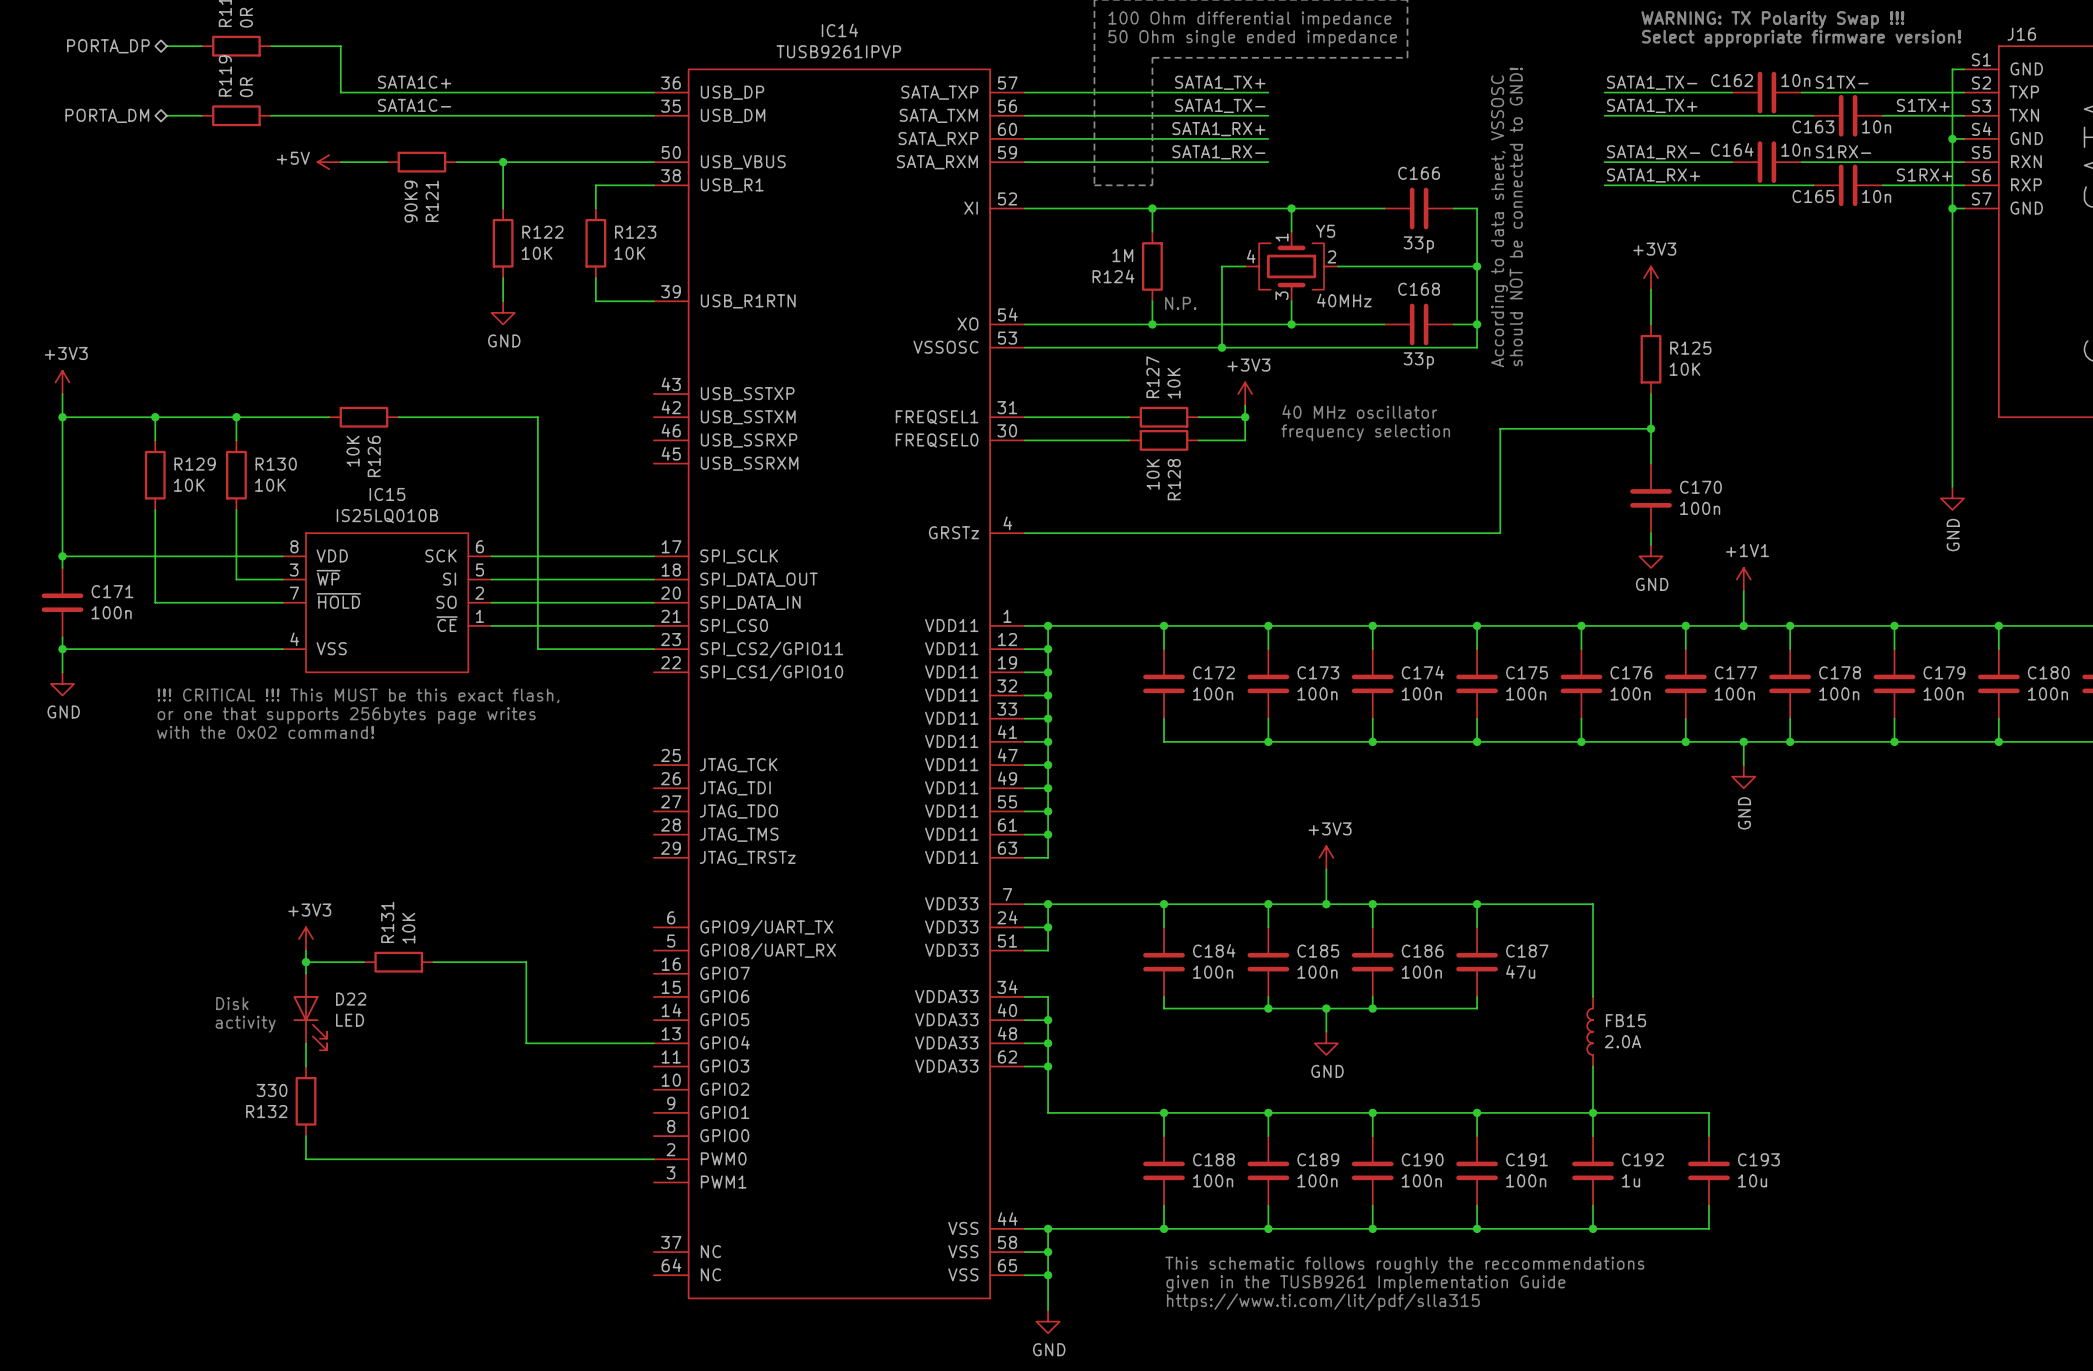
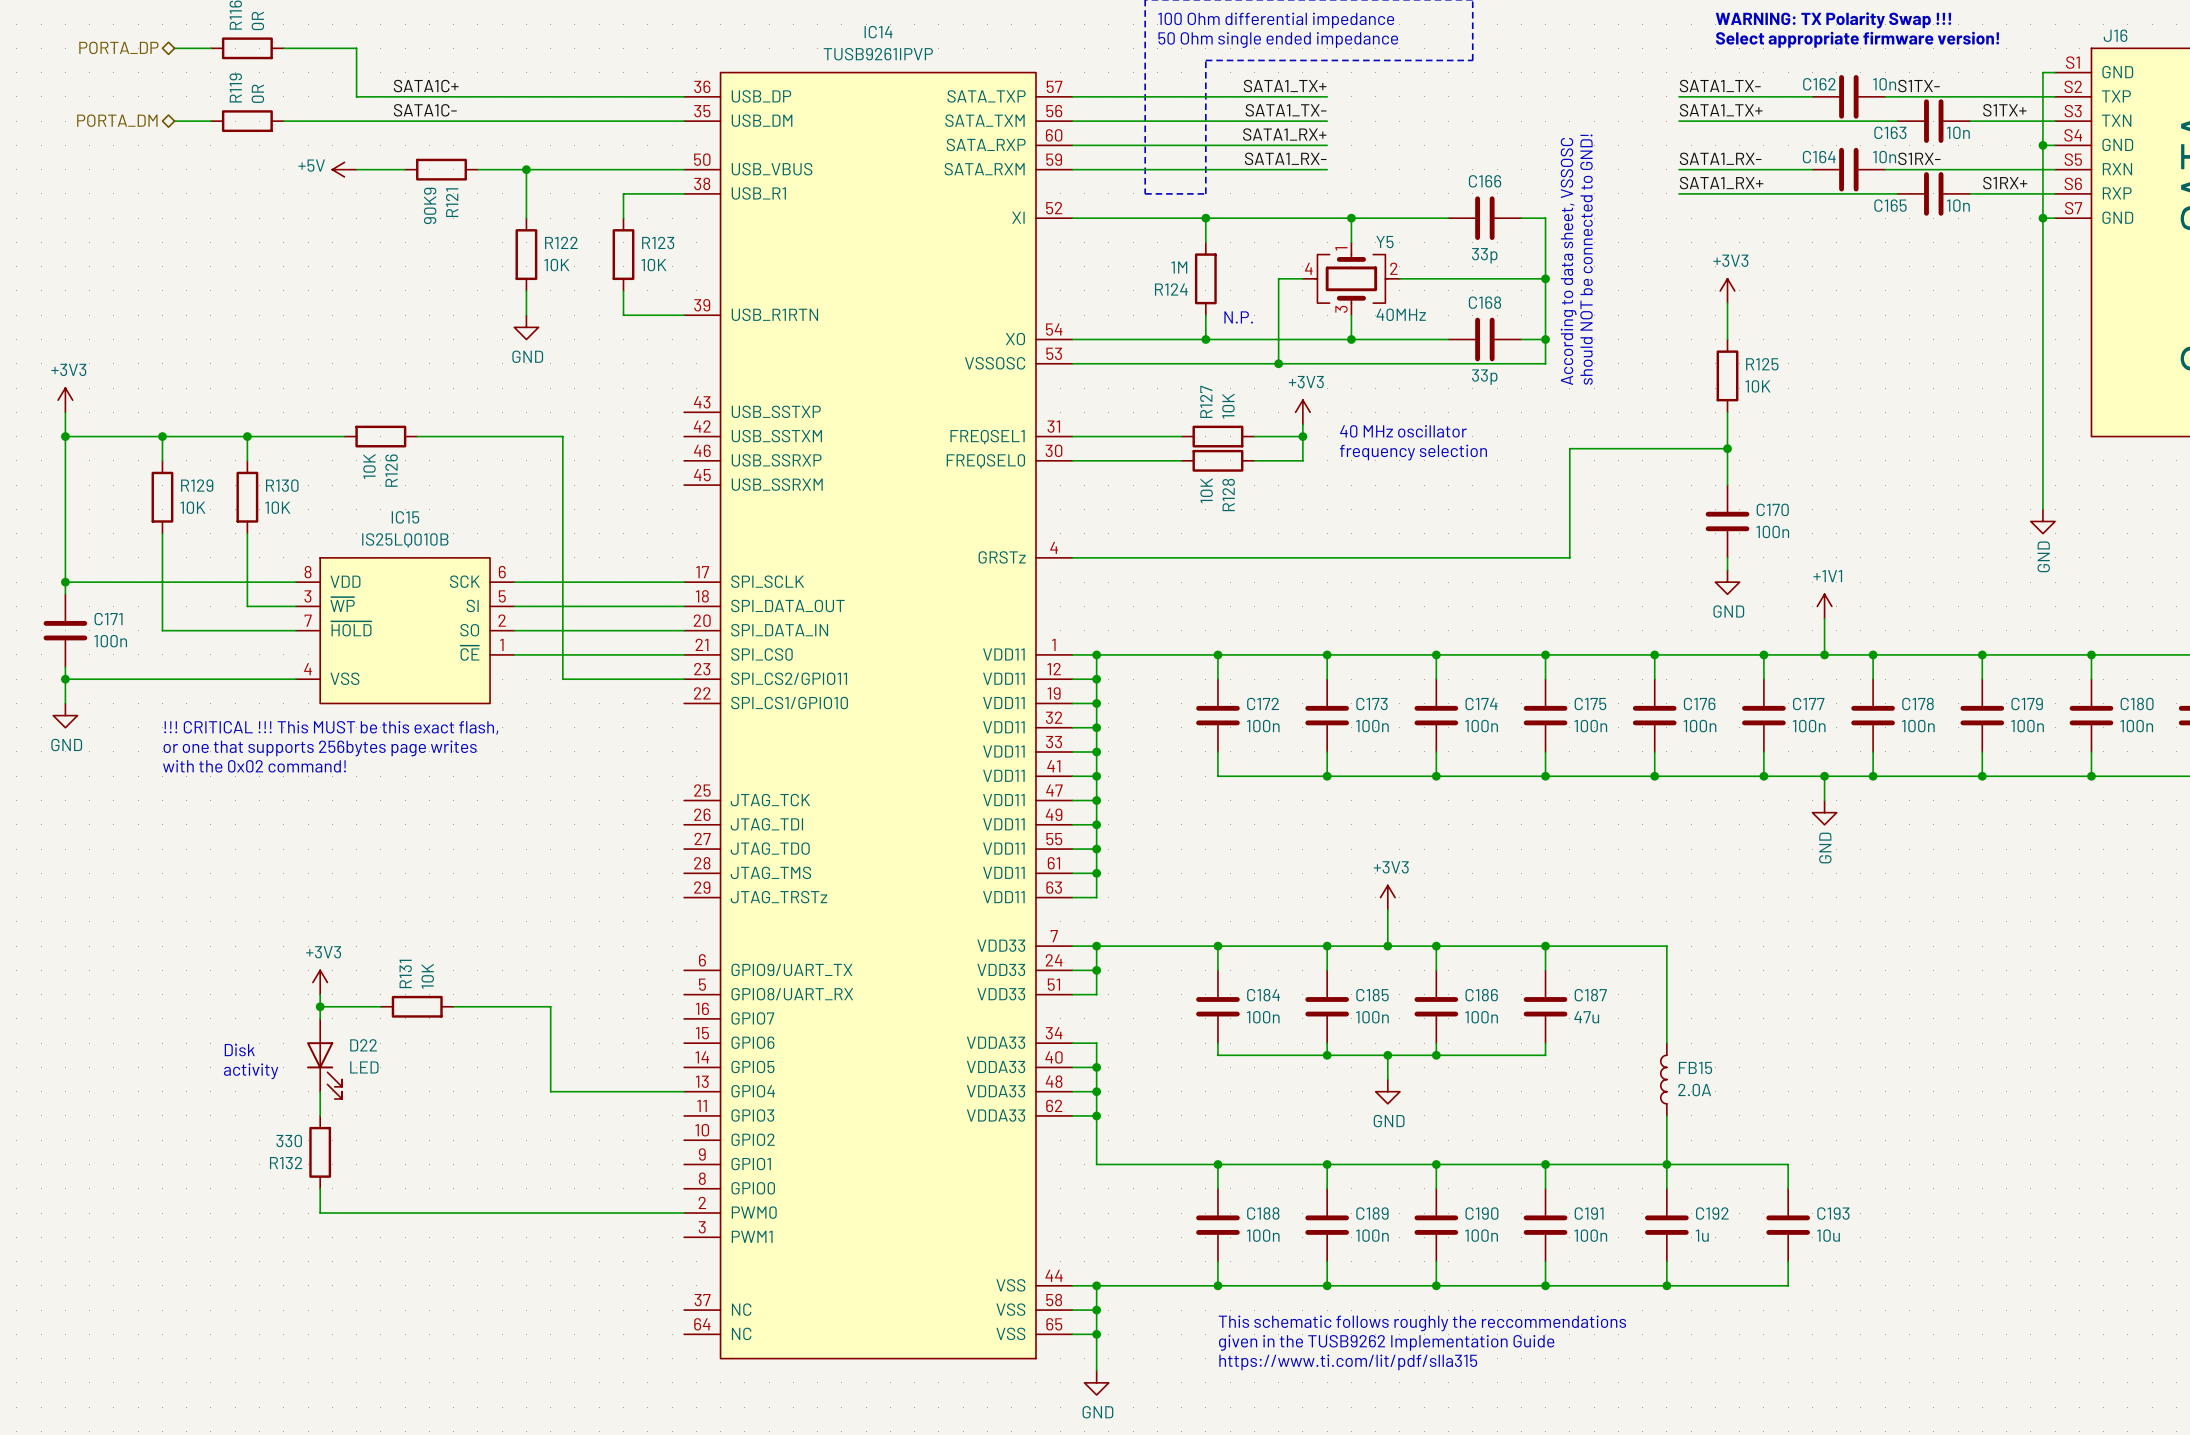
text: given in the TUSB9261 Implementation Guide (1365, 1283) -> given in the TUSB9262 Implementation Guide (1386, 1342)

